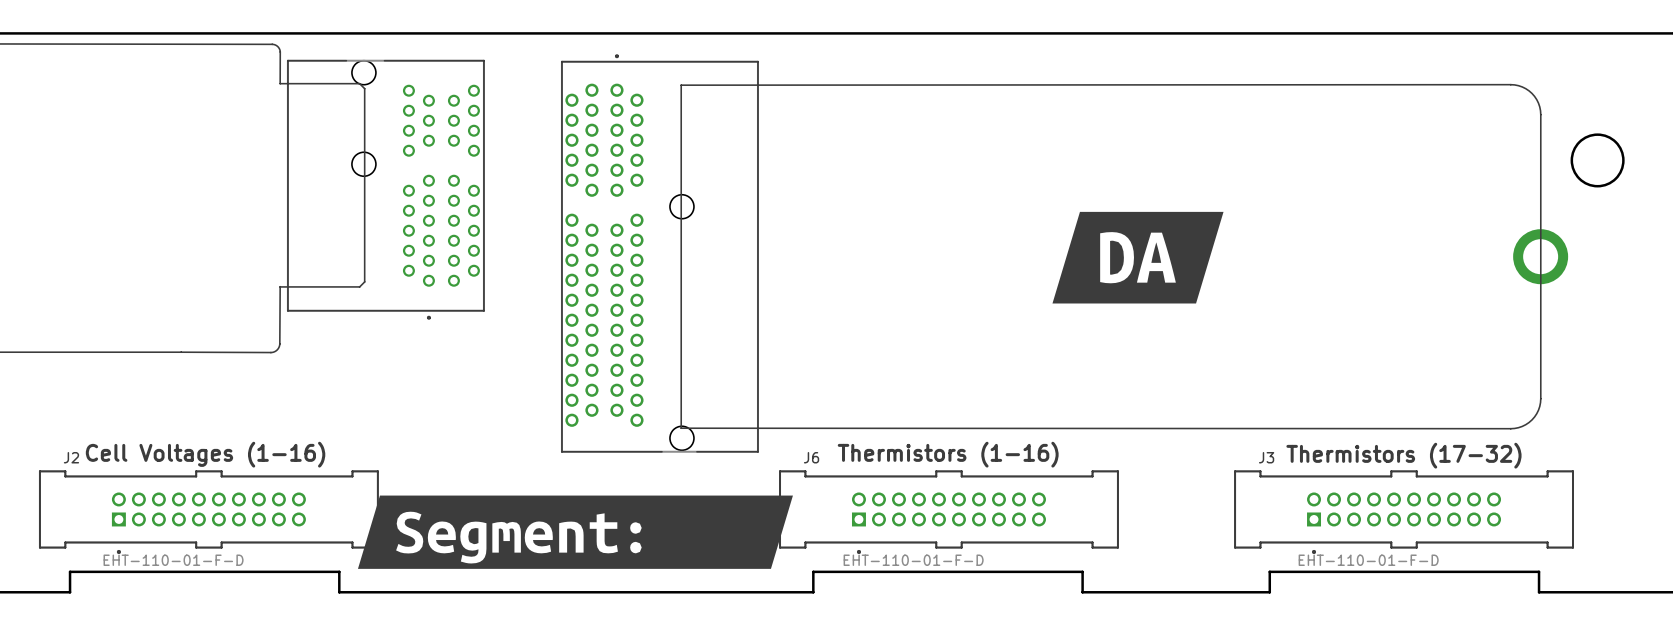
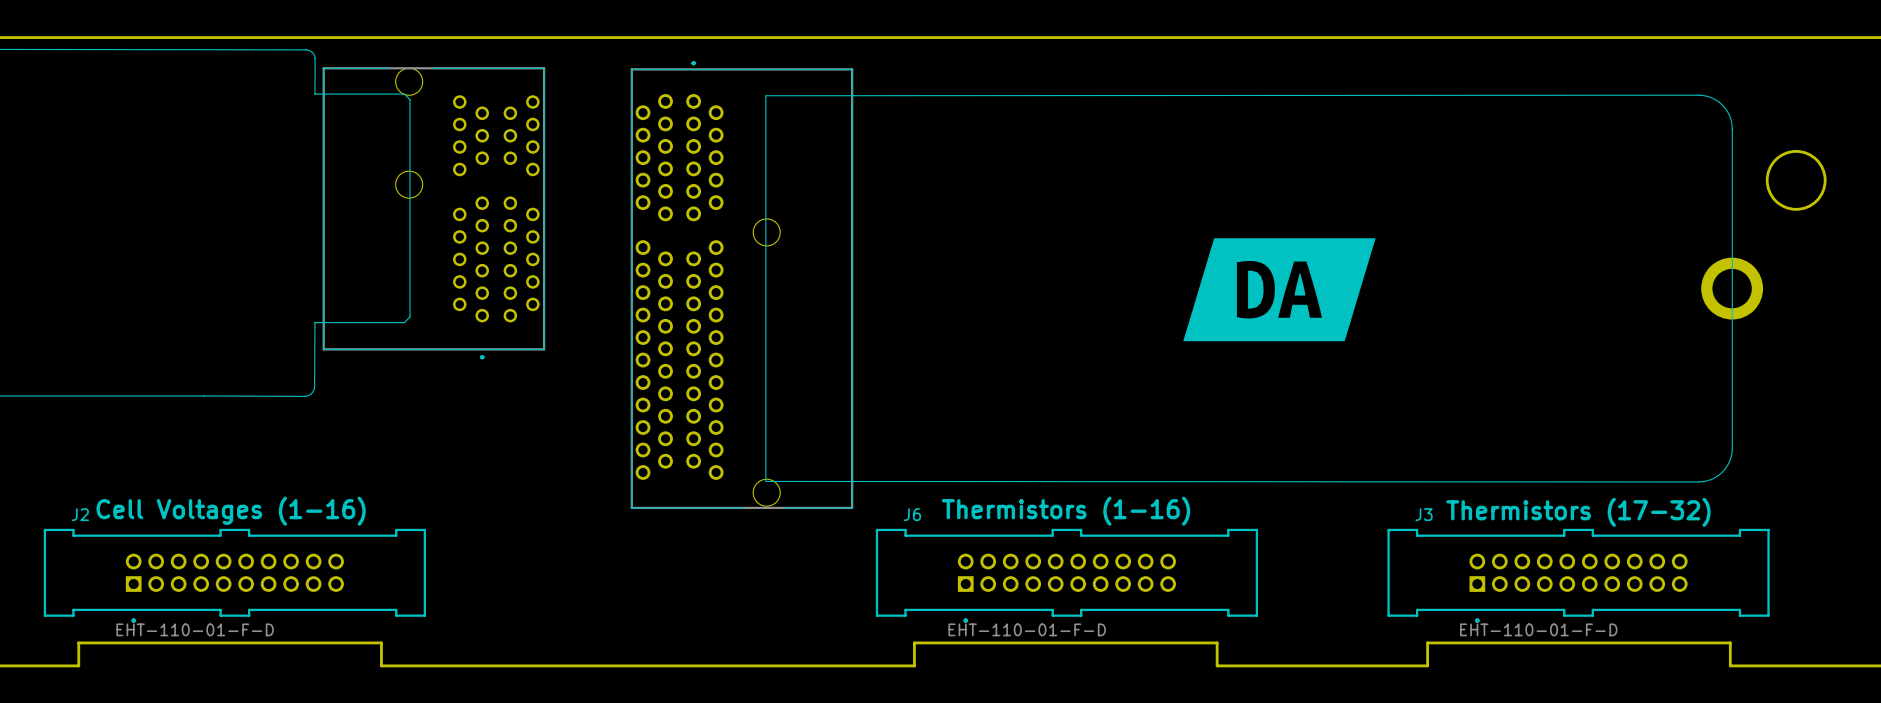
drawing: [357, 495, 793, 569] -> none

